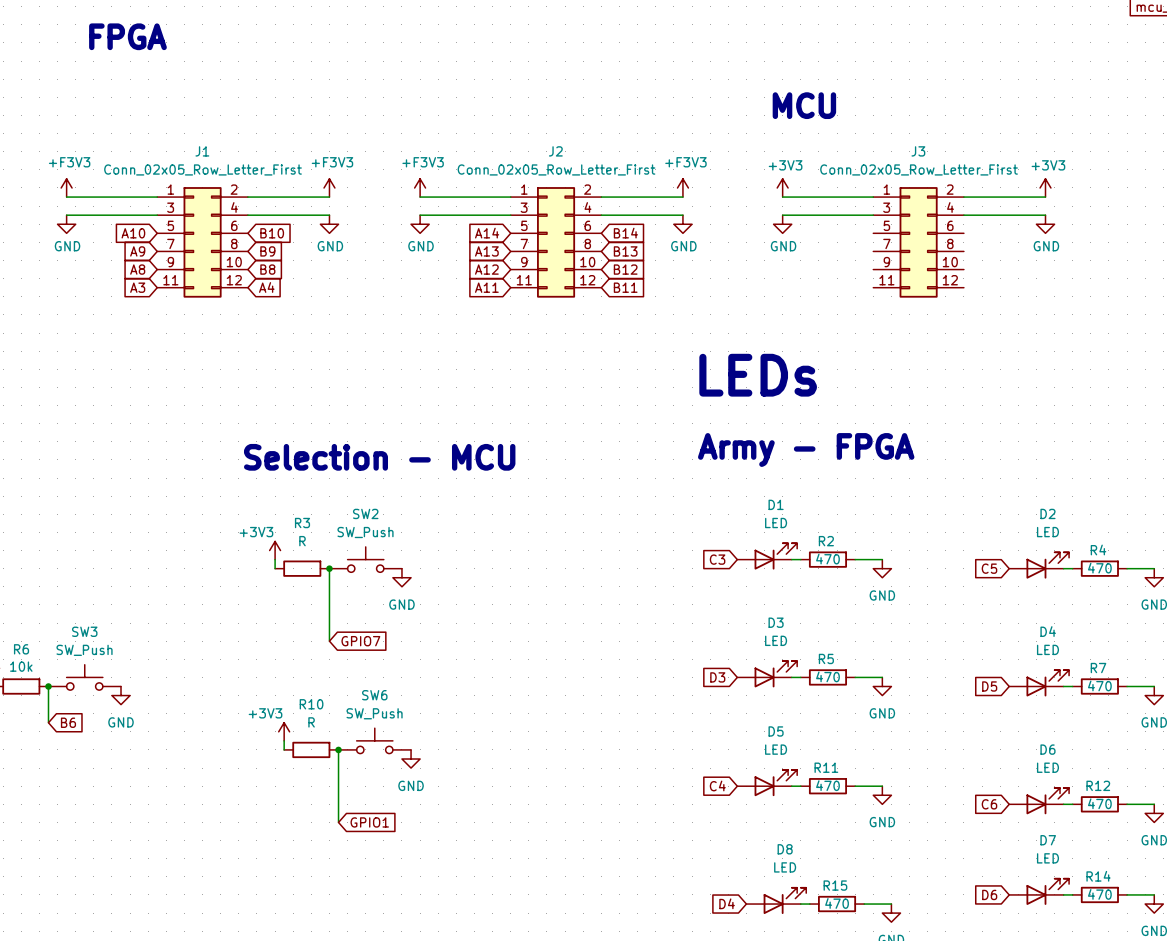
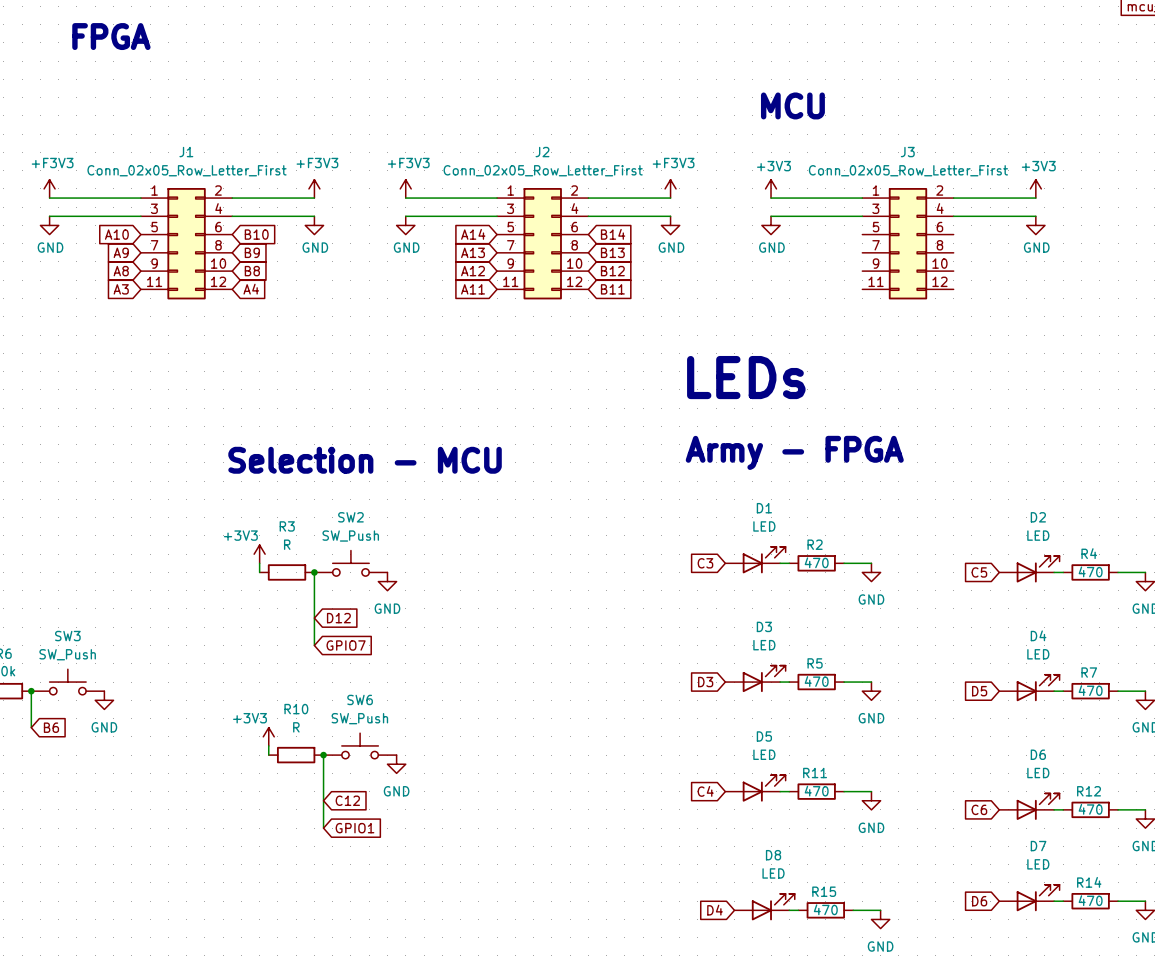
global label: none -> D12 (338, 618)
global label: none -> C12 (347, 800)

